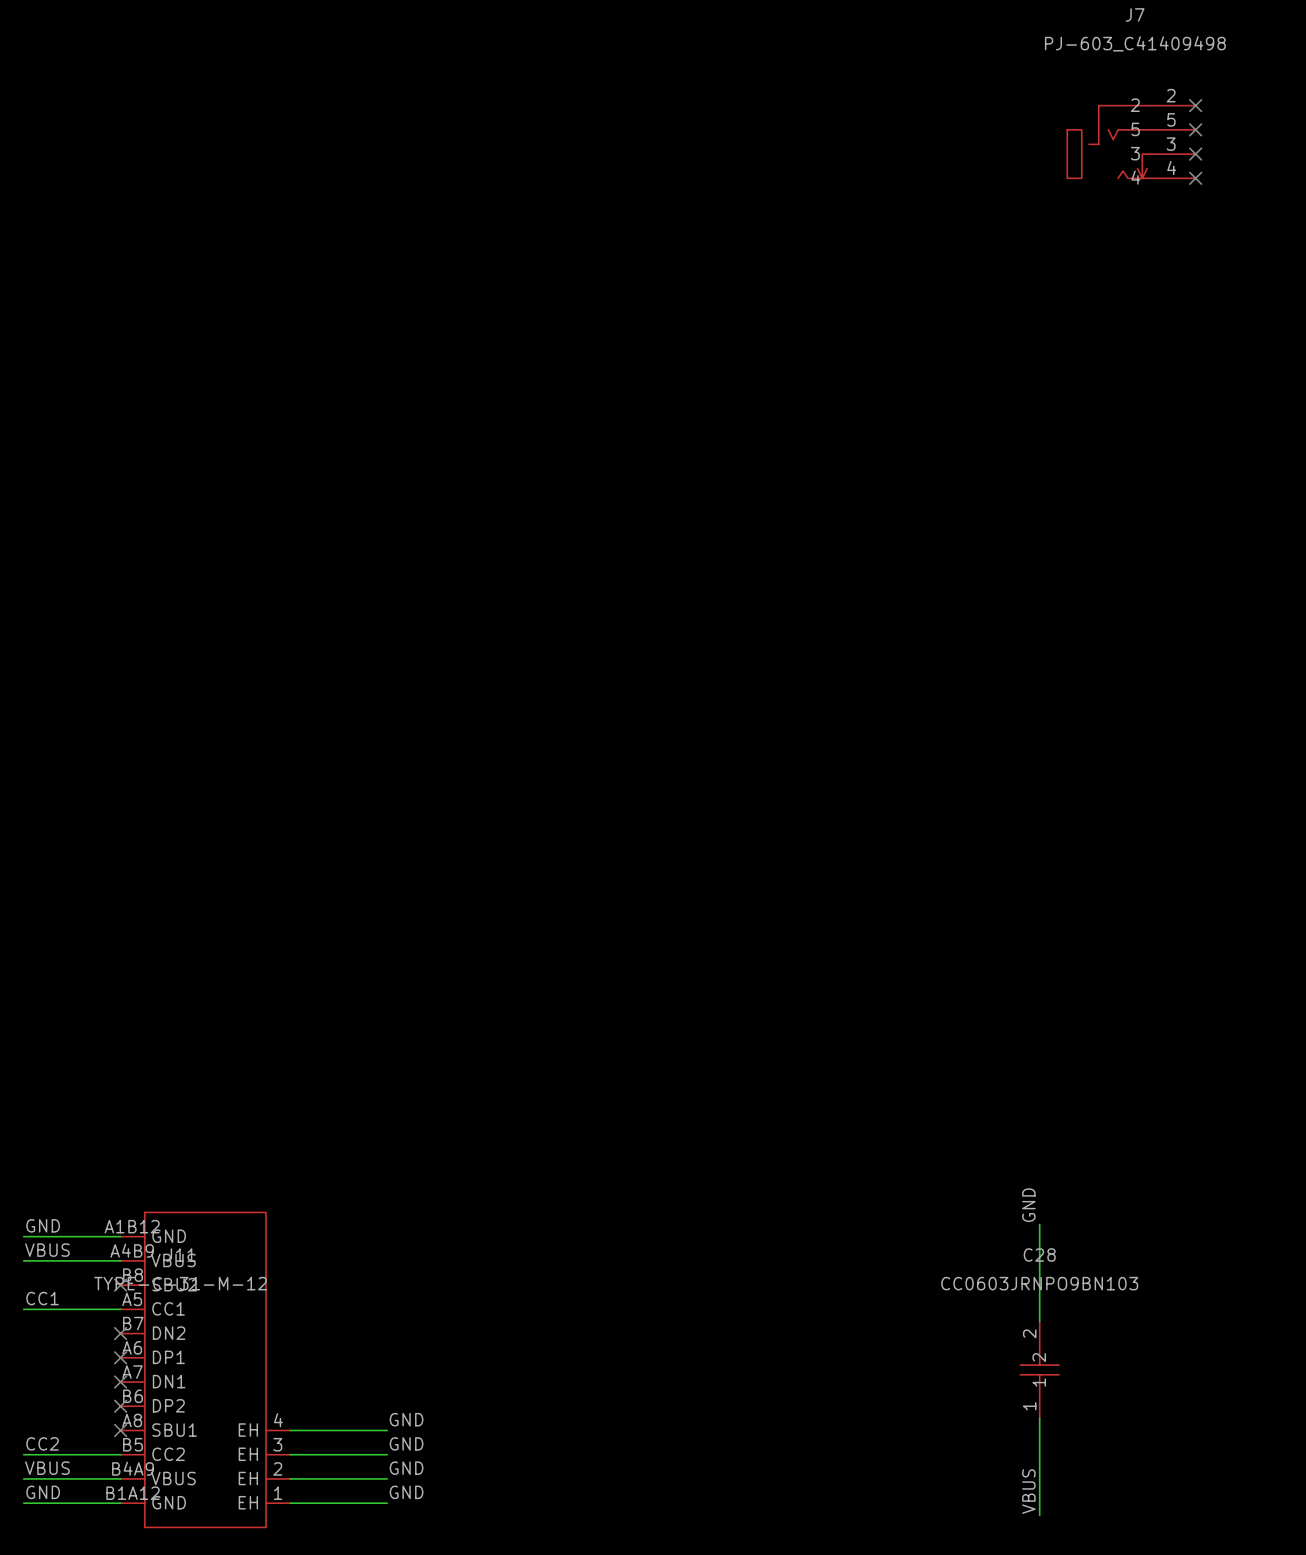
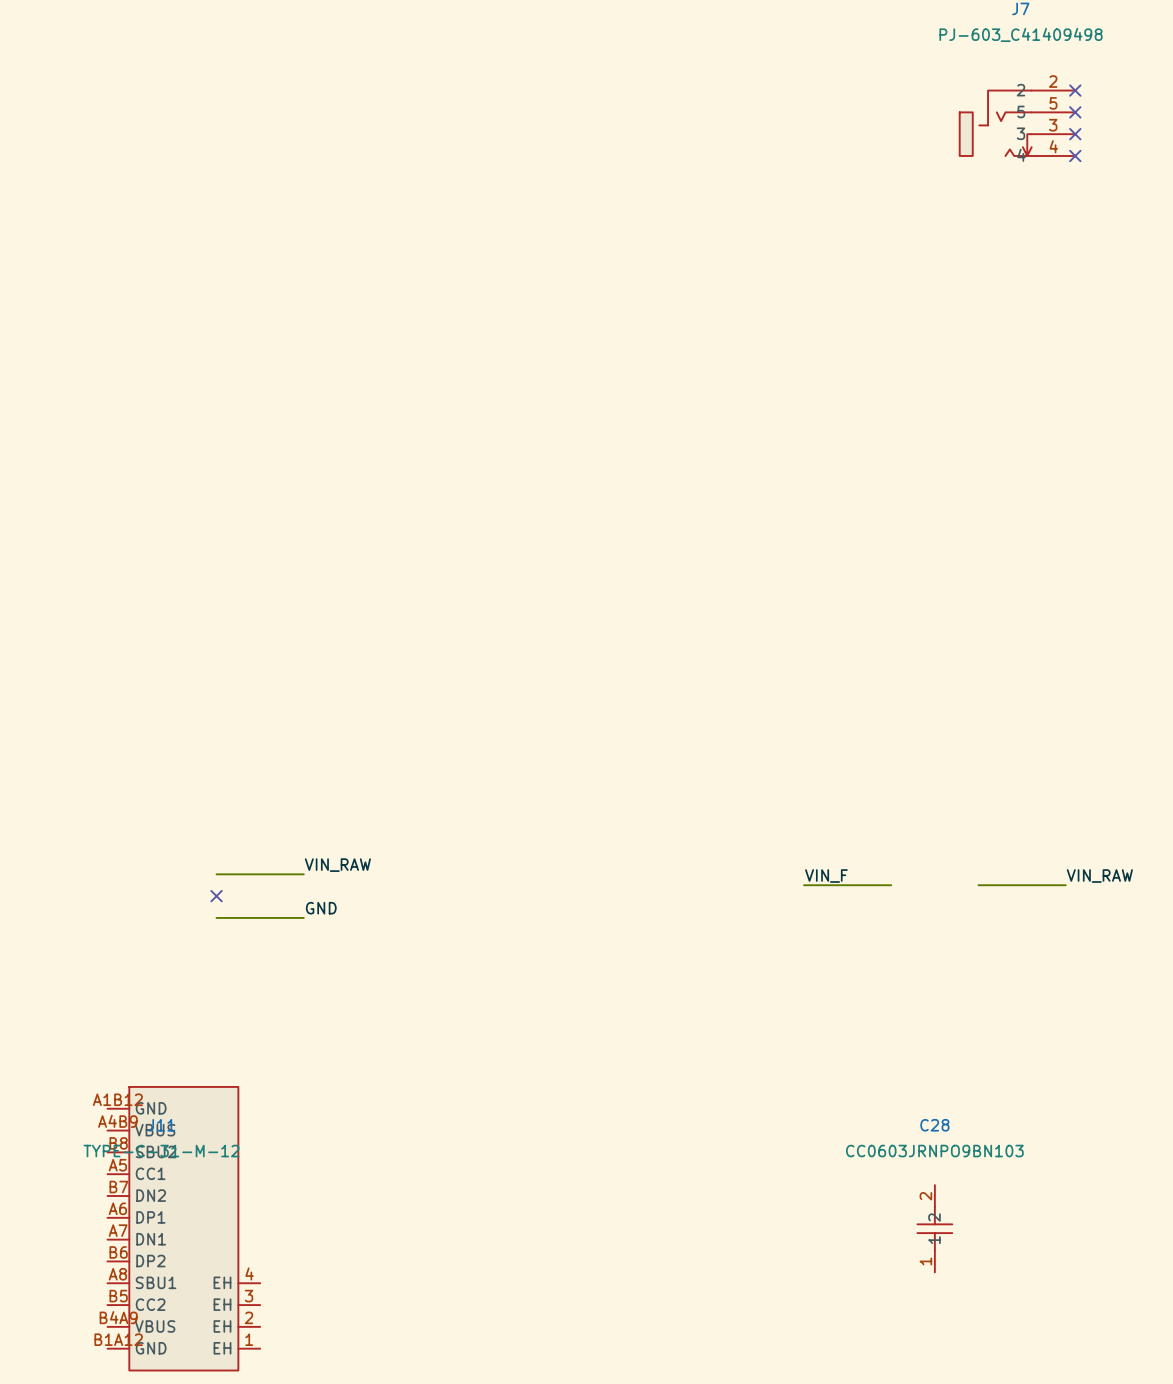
label: none -> VIN_RAW (337, 865)
wire: none -> (216, 874) (303, 874)
label: none -> VIN_F (826, 876)
label: none -> VIN_RAW (1099, 876)
wire: none -> (804, 885) (891, 885)
wire: none -> (978, 885) (1065, 885)
no-connect mark: none -> (216, 896)
label: none -> GND (321, 908)
wire: none -> (216, 917) (303, 917)
label: GND (1028, 1205) -> none
wire: (1039, 1224) (1039, 1321) -> none
label: GND (43, 1225) -> none
wire: (23, 1236) (120, 1236) -> none
label: VBUS (47, 1250) -> none
wire: (23, 1260) (120, 1260) -> none
no-connect mark: (120, 1285) -> none
label: CC1 (42, 1298) -> none
wire: (23, 1309) (120, 1309) -> none
no-connect mark: (120, 1333) -> none
no-connect mark: (120, 1357) -> none
no-connect mark: (120, 1382) -> none
no-connect mark: (120, 1406) -> none
wire: (1039, 1418) (1039, 1515) -> none
label: GND (406, 1419) -> none
no-connect mark: (120, 1430) -> none
wire: (290, 1430) (387, 1430) -> none
label: CC2 (42, 1443) -> none
label: GND (406, 1443) -> none
wire: (23, 1454) (120, 1454) -> none
wire: (290, 1454) (387, 1454) -> none
label: VBUS (47, 1468) -> none
label: GND (406, 1468) -> none
wire: (23, 1478) (120, 1478) -> none
wire: (290, 1478) (387, 1478) -> none
label: VBUS (1028, 1491) -> none
label: GND (43, 1492) -> none
label: GND (406, 1492) -> none
wire: (23, 1503) (120, 1503) -> none
wire: (290, 1503) (387, 1503) -> none

